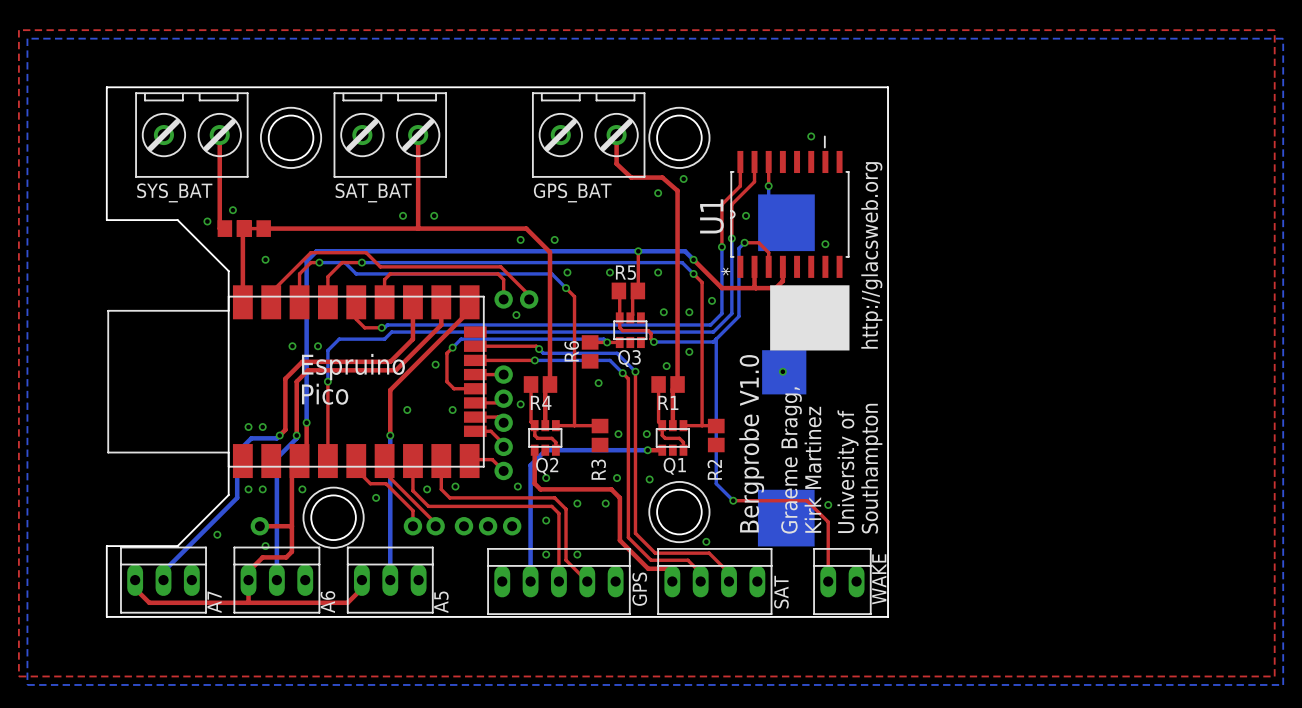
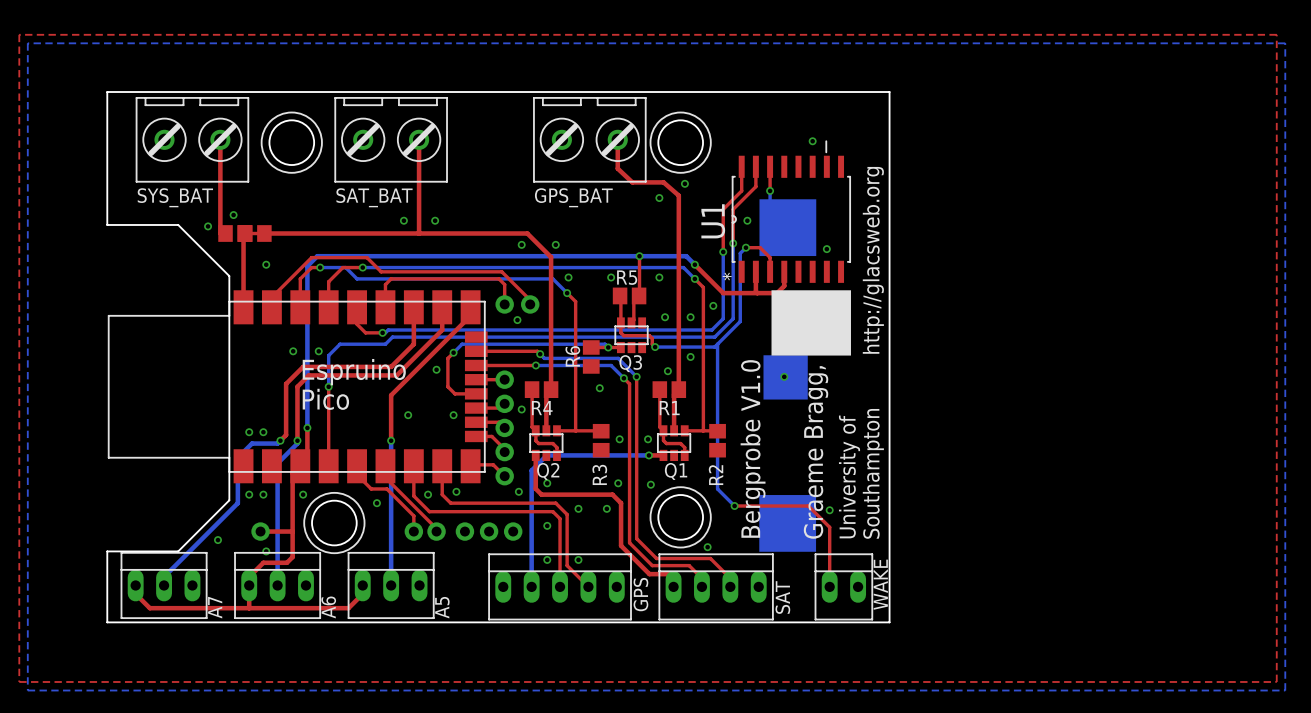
text: Graeme Bragg, (791, 460) -> none
text: Kirk Martinez (813, 469) -> Graeme Bragg, (816, 452)

